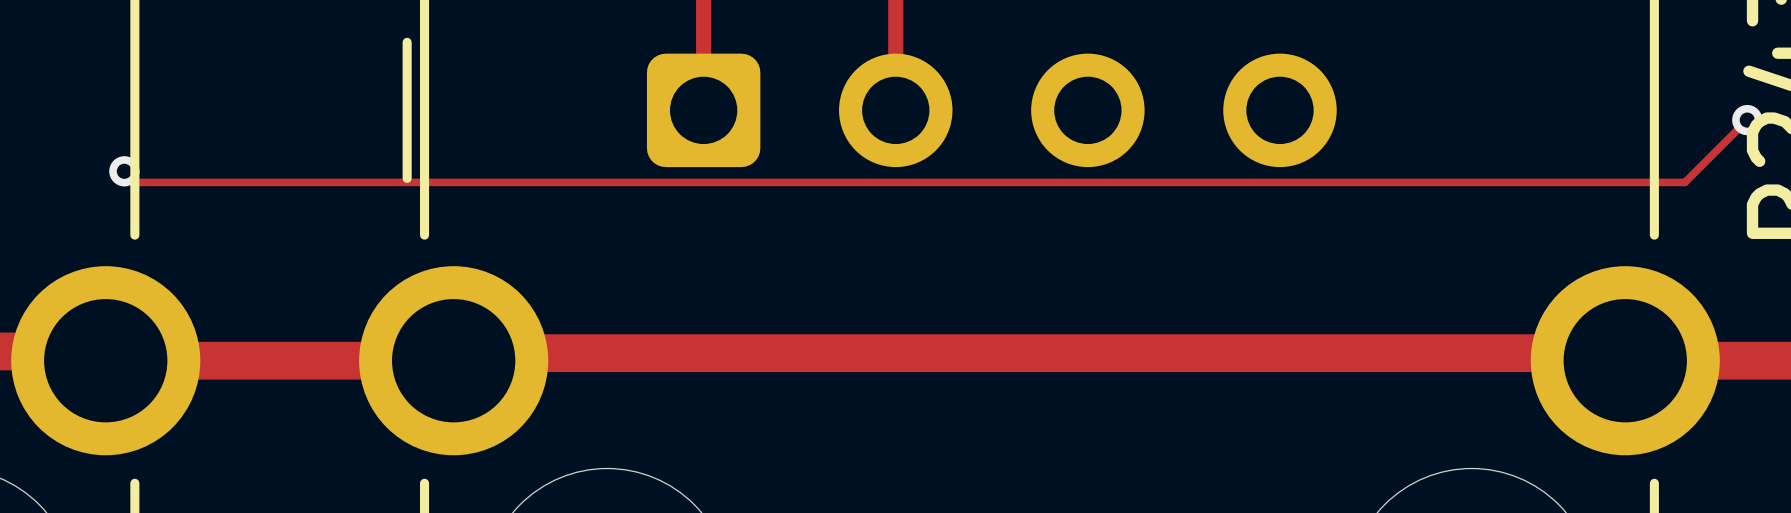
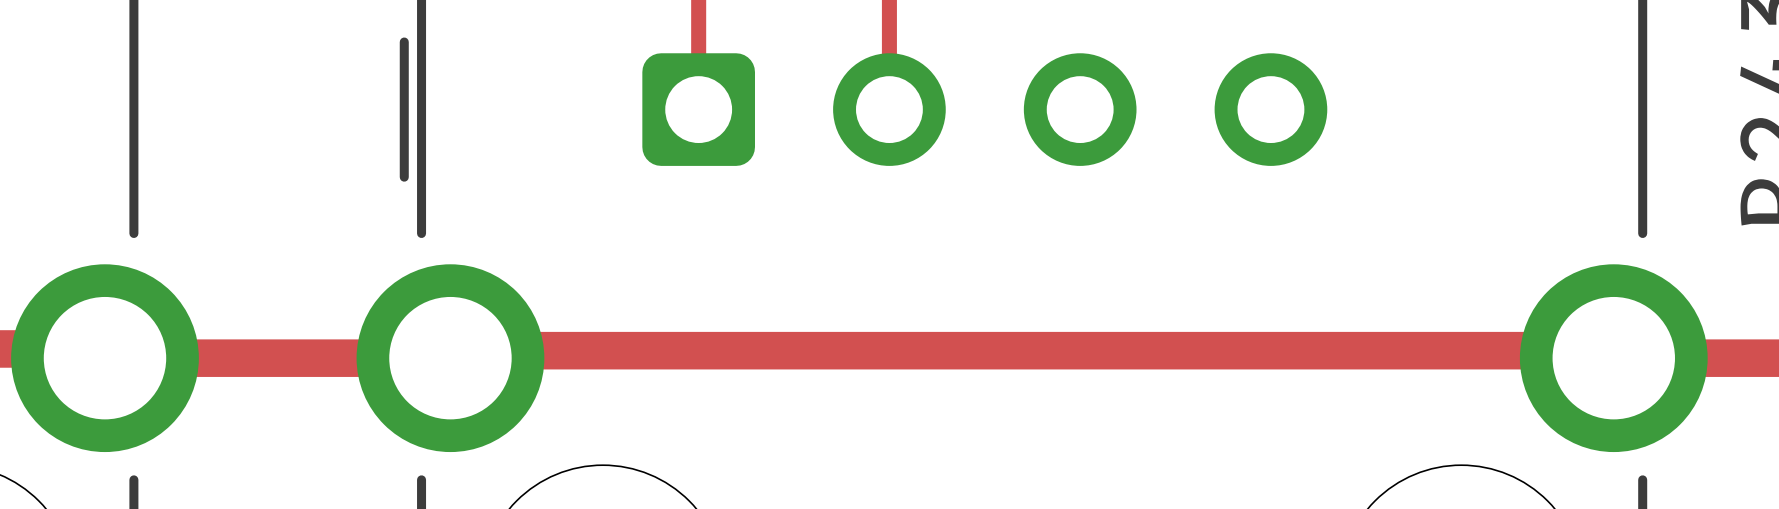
track: (1747, 120) (1684, 182) (135, 182) (124, 171) -> none
via: (1747, 120) -> none
via: (124, 171) -> none

